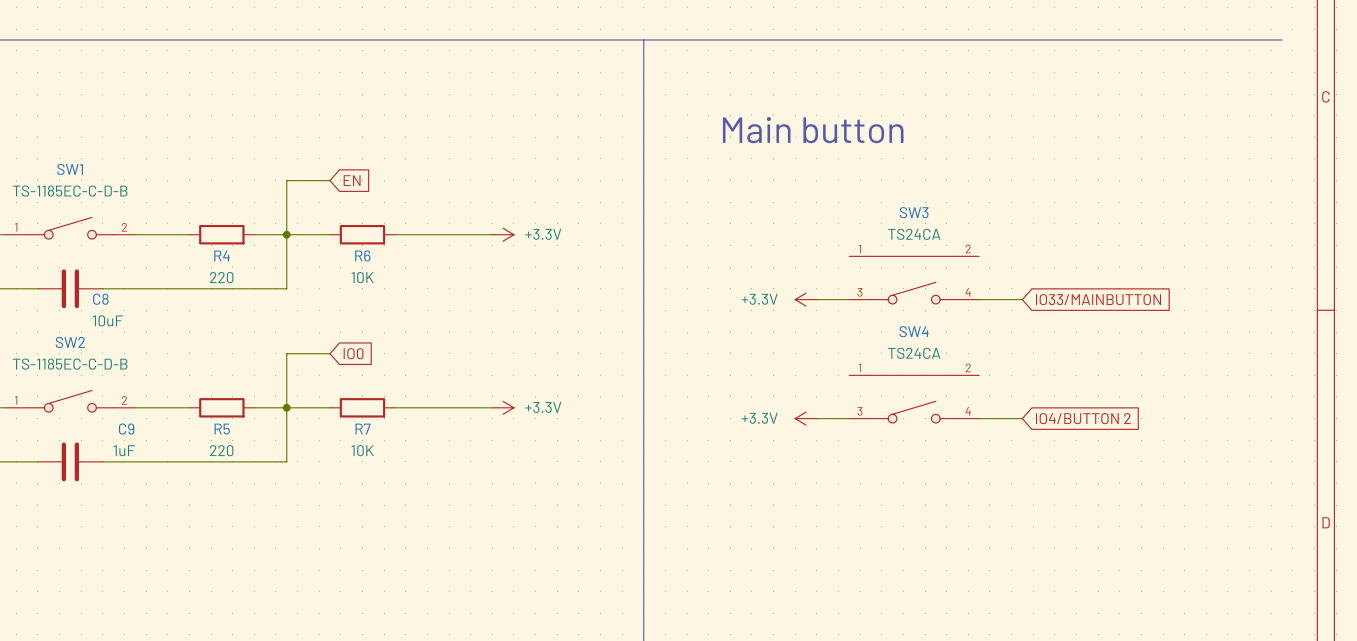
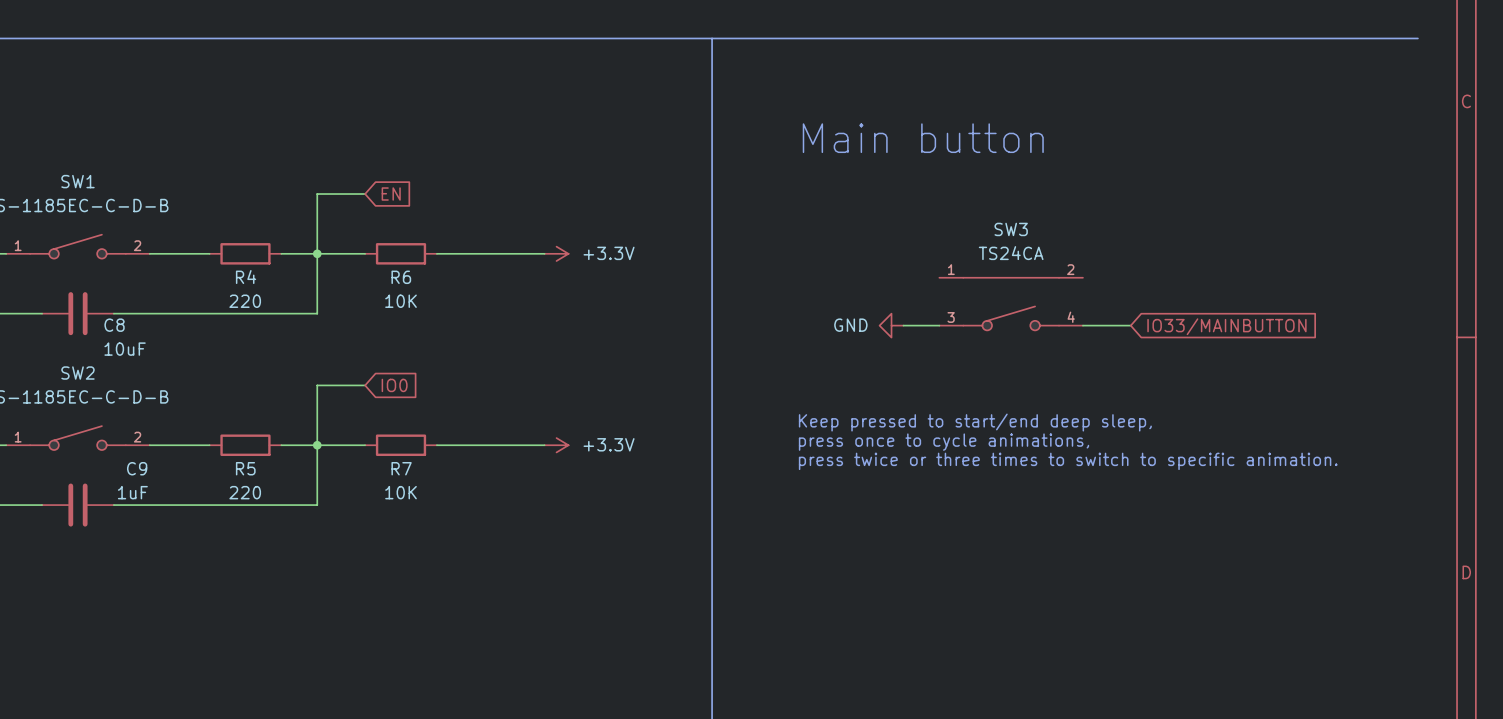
power symbol: +3.3V (806, 299) -> GND (891, 325)
text: none -> Keep pressed to start/end deep sleep, (975, 422)
SW4: TS24CA (914, 399) -> none
text: none -> press once to cycle animations, (944, 442)
power symbol: +3.3V (806, 418) -> none
wire: (816, 418) (849, 418) -> none
global label: IO4/BUTTON 2 (1083, 418) -> none
text: none -> press twice or three times to switch to specific animation. (1068, 461)

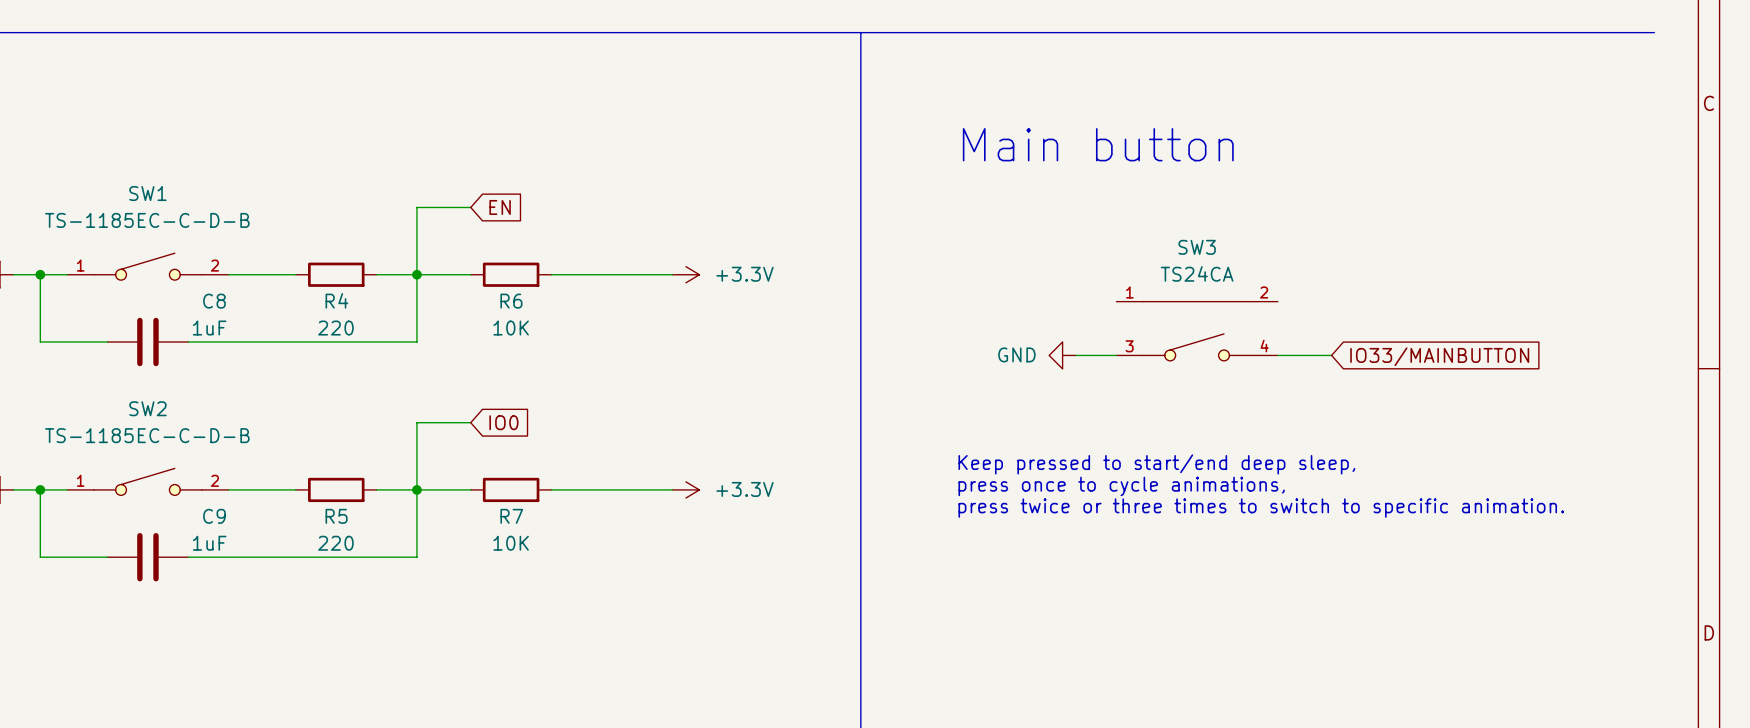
C8 name position: C8 (114, 325) -> C8 (214, 301)
C8 value: 10uF (125, 349) -> 1uF (209, 328)

